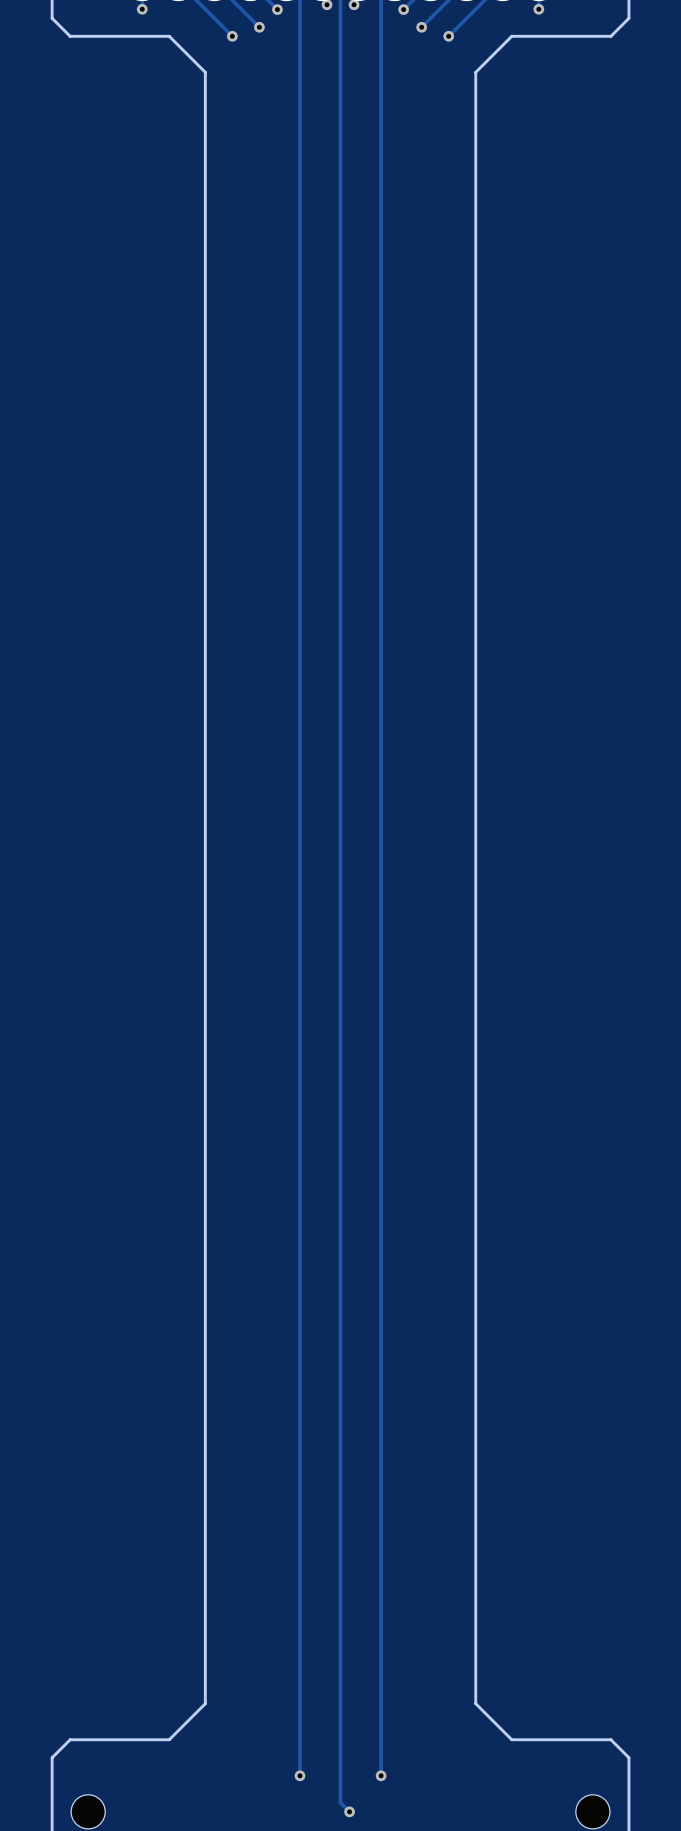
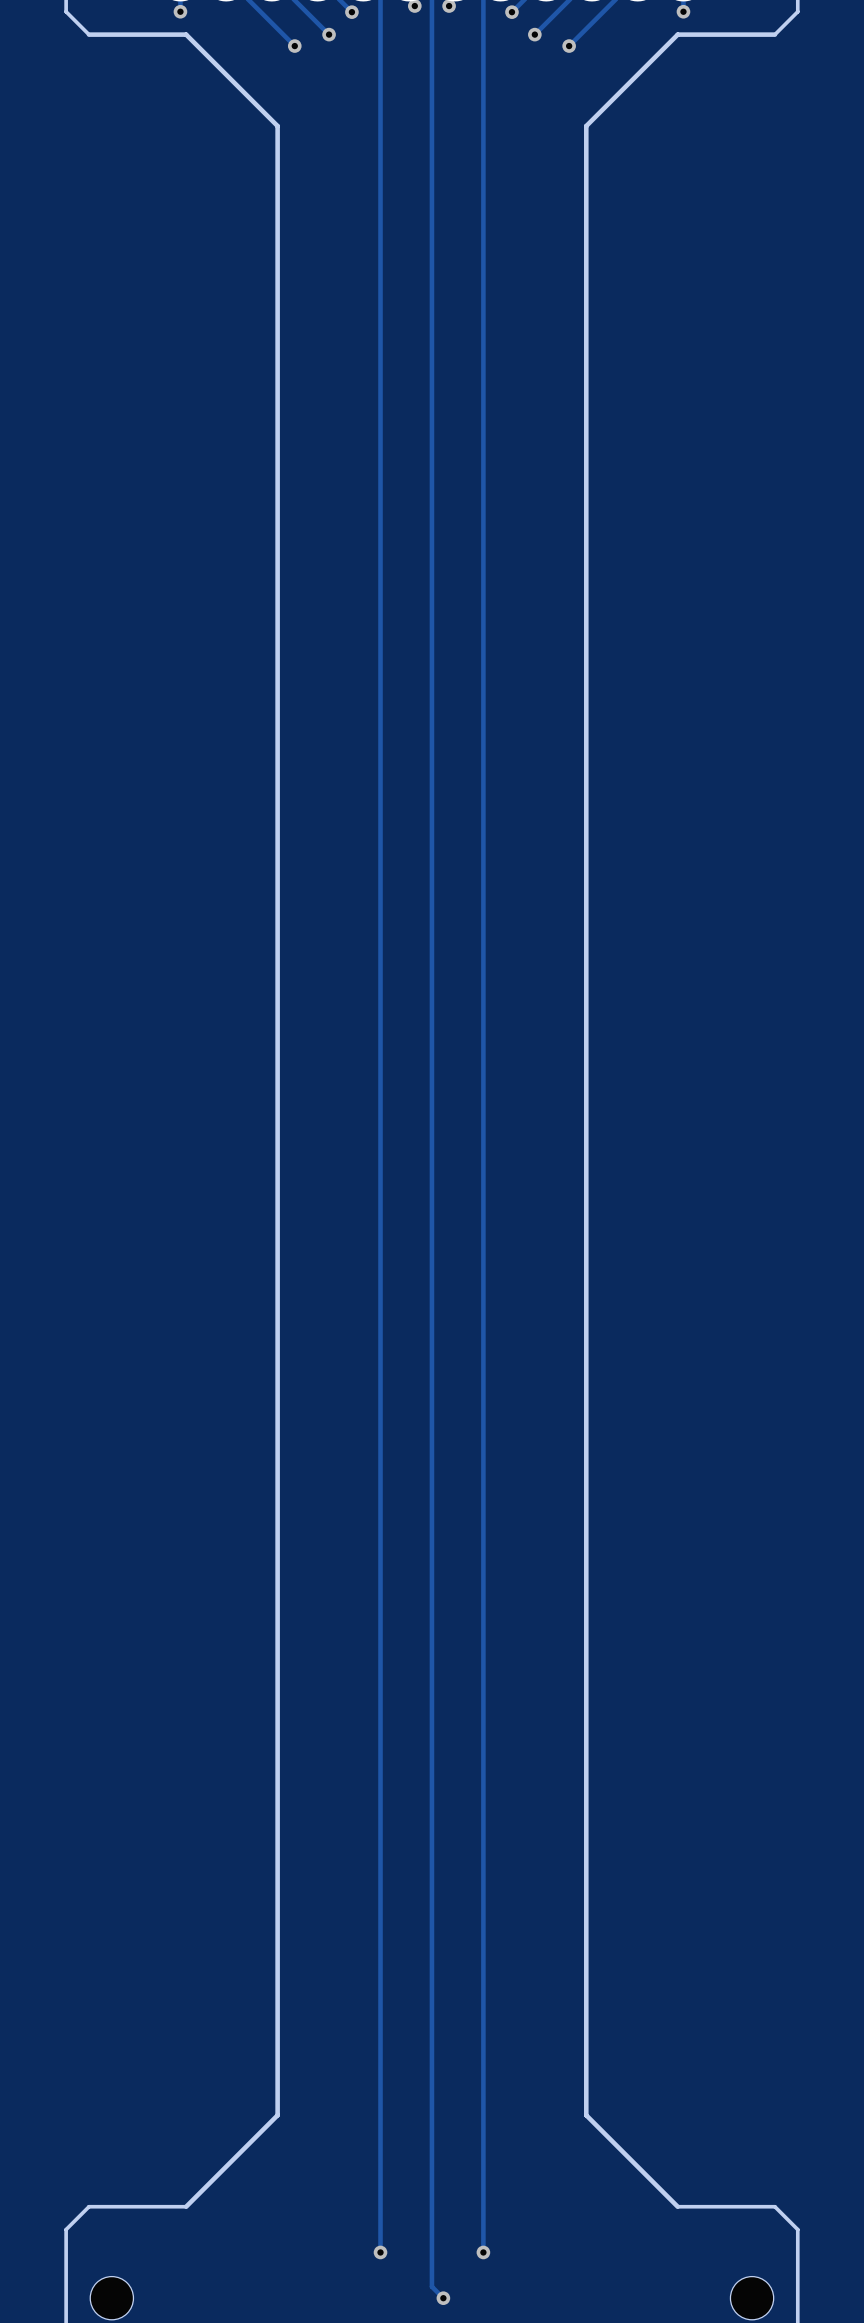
board edge: (52, 9) (52, 18) (70, 36) (169, 36) (205, 72) (205, 1703) (169, 1739) (146, 1739) -> (66, 11) (88, 34) (186, 34) (277, 126) (277, 2115) (186, 2206)
board edge: (628, 9) (628, 18) (610, 36) (511, 36) (475, 72) (475, 1703) (511, 1739) (534, 1739) -> (797, 11) (774, 34) (677, 34) (586, 126) (586, 2115) (677, 2206)

